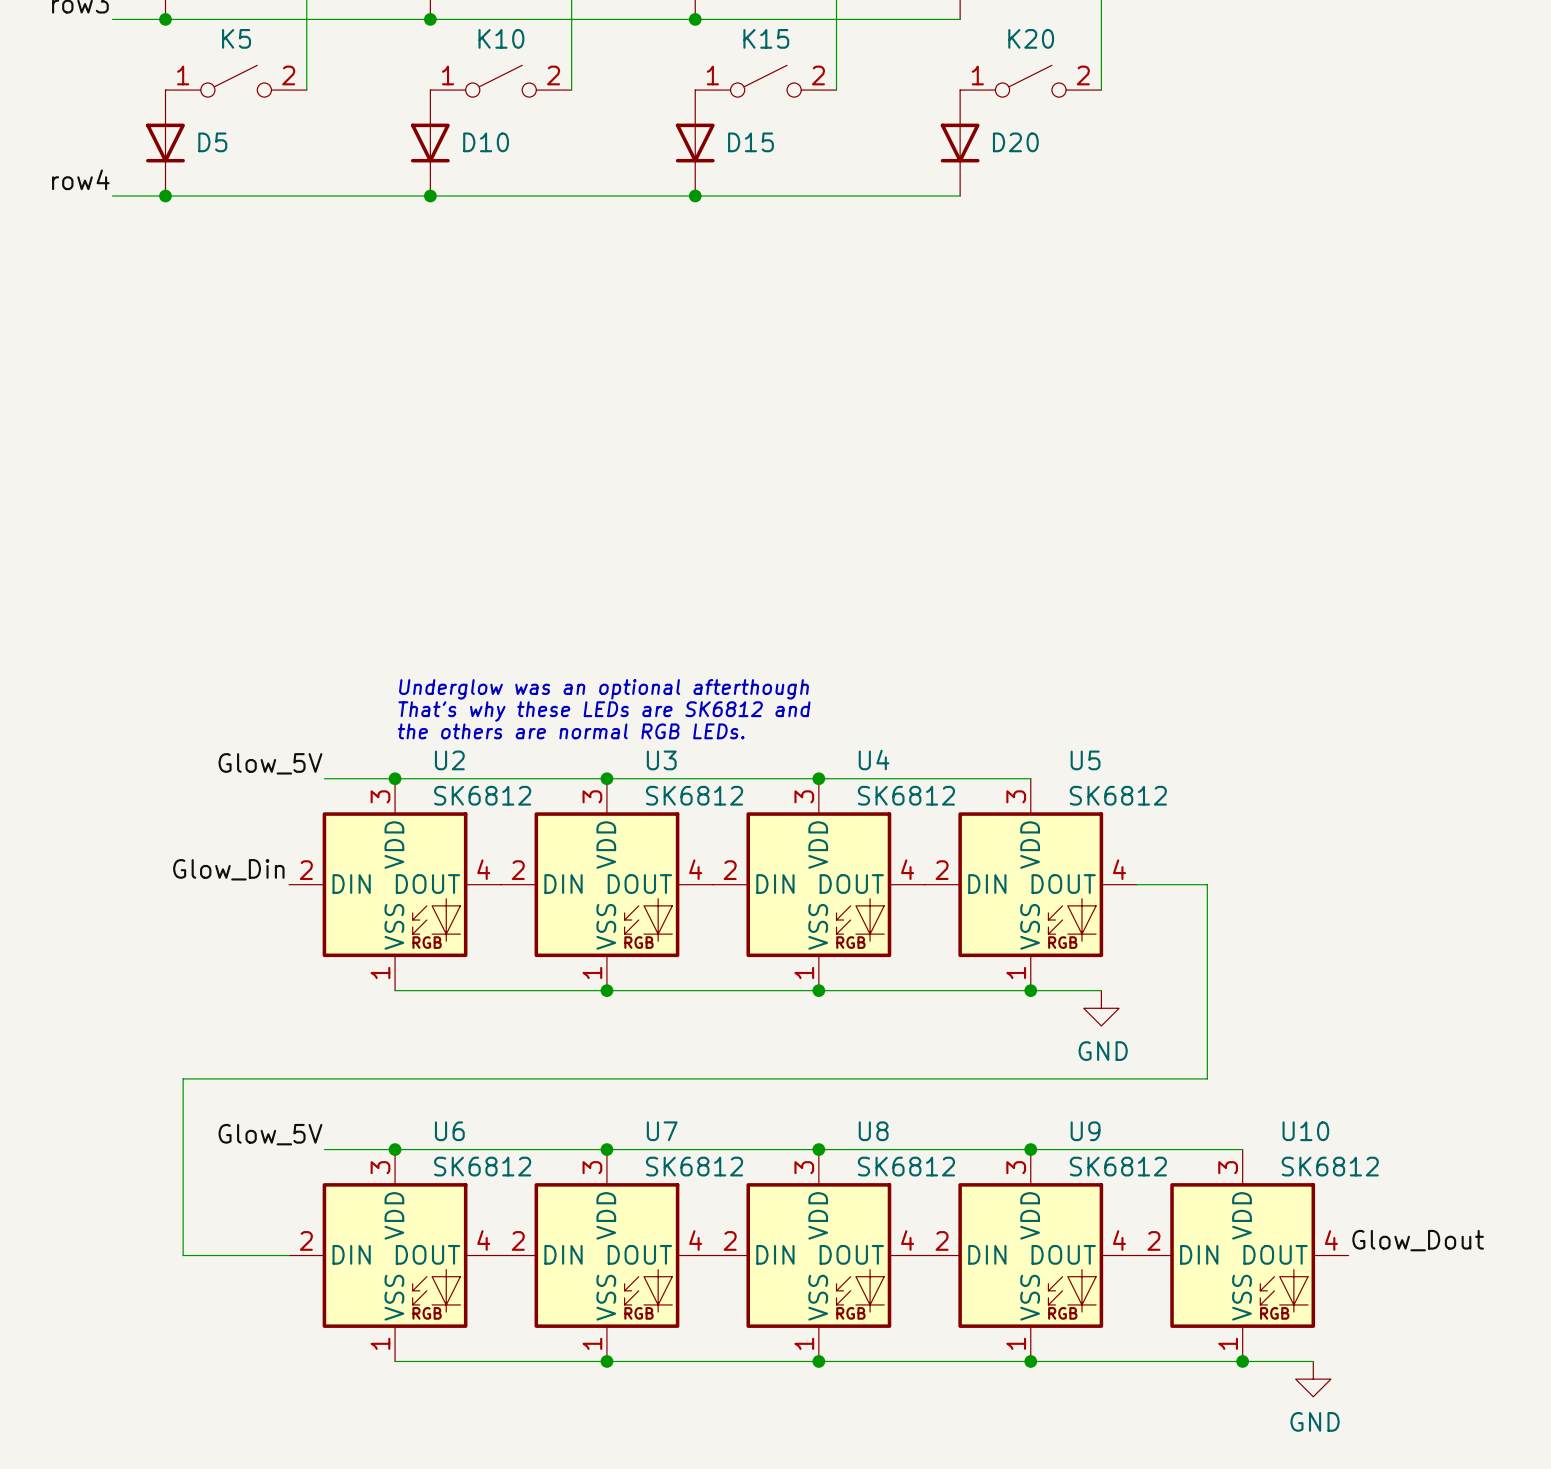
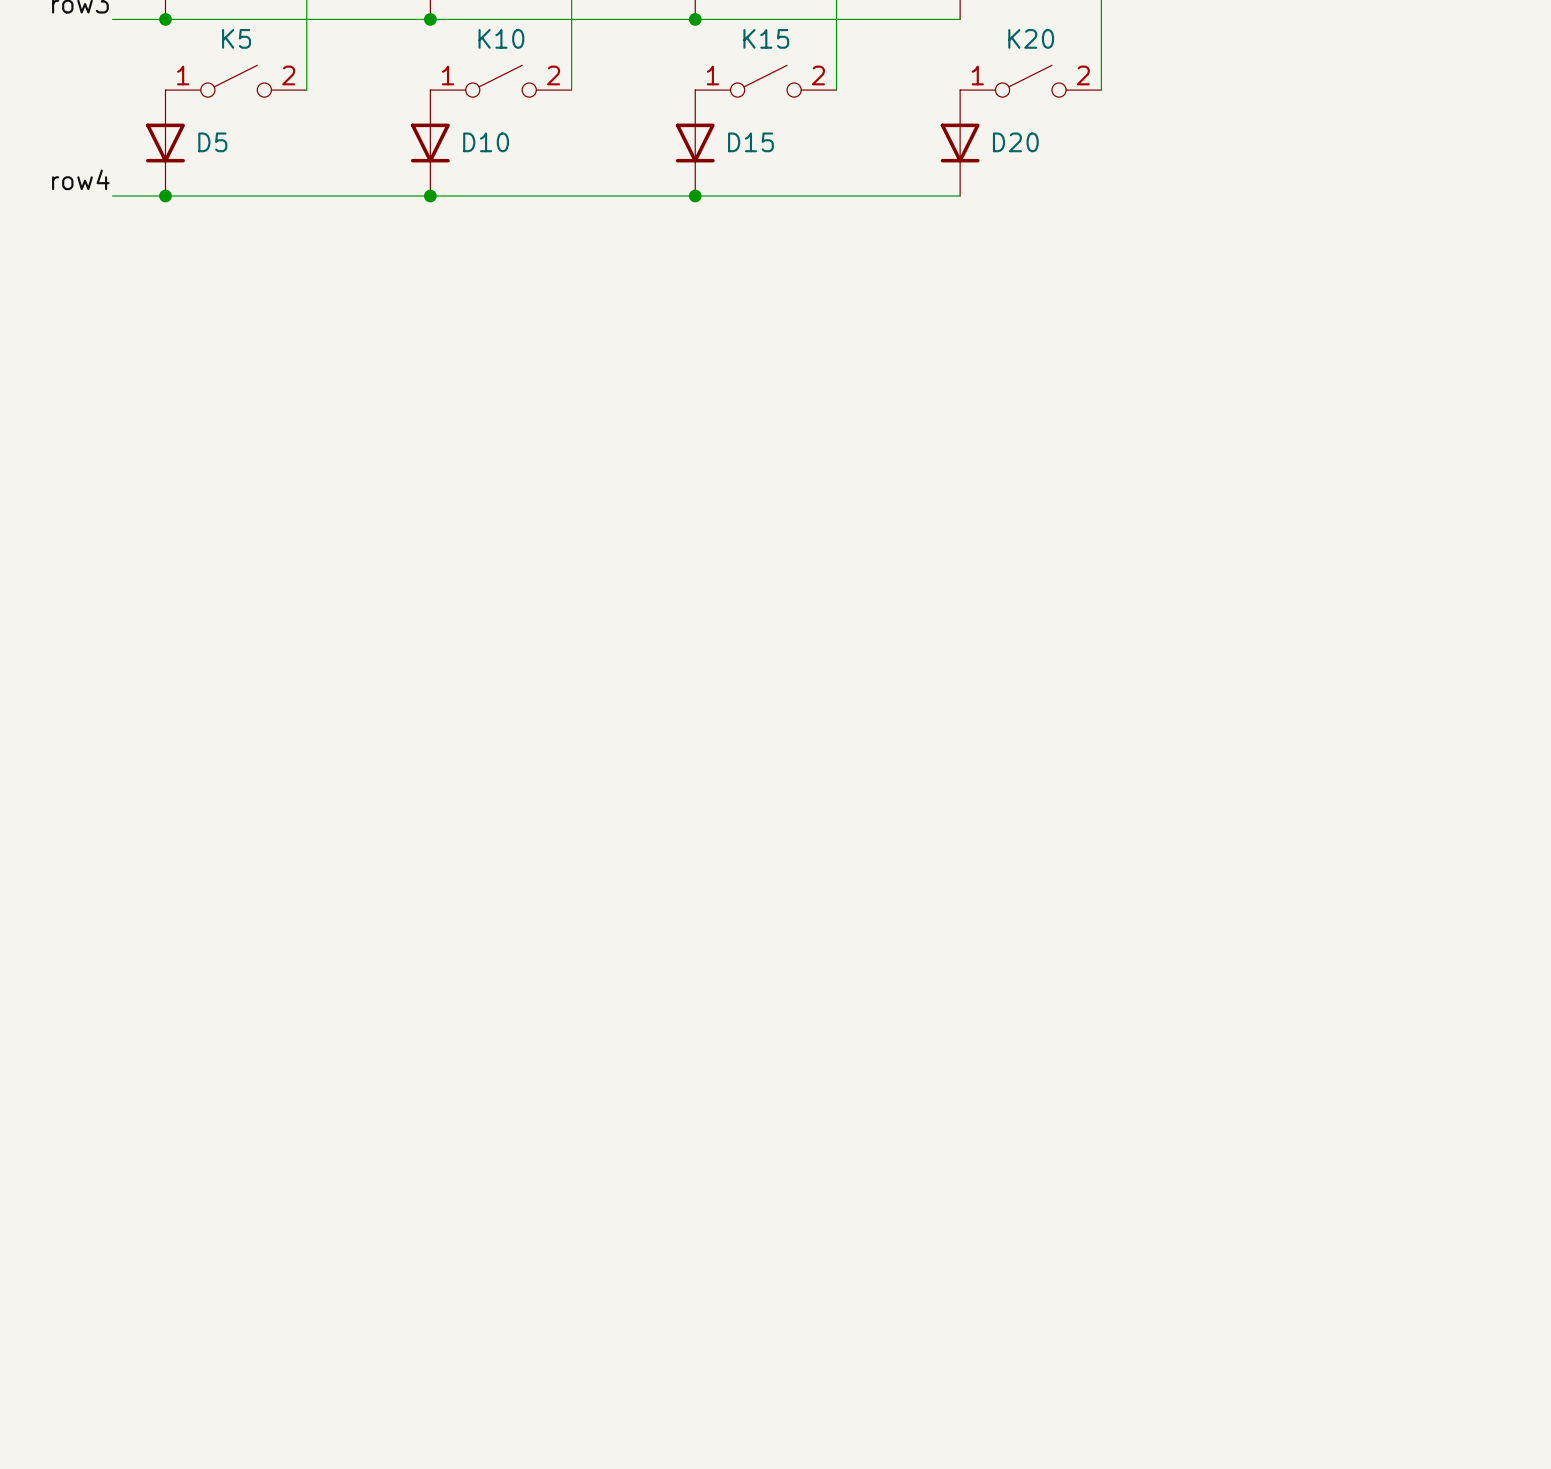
text: Underglow was an optional afterthough (603, 689) -> none
text: That's why these LEDs are SK6812 and (604, 711) -> none
text: the others are normal RGB LEDs. (571, 731) -> none
label: Glow_5V (270, 763) -> none
wire: (324, 778) (1030, 778) -> none
junction: (395, 778) -> none
junction: (606, 778) -> none
junction: (818, 778) -> none
label: Glow_Din (228, 869) -> none
U2: SK6812 (395, 884) -> none
U3: SK6812 (606, 884) -> none
U4: SK6812 (818, 884) -> none
U5: SK6812 (1030, 884) -> none
wire: (1136, 884) (1207, 884) (1207, 1078) (183, 1078) (183, 1255) (289, 1255) -> none
wire: (395, 990) (1101, 990) -> none
junction: (606, 990) -> none
junction: (818, 990) -> none
junction: (1030, 990) -> none
power symbol: GND (1101, 1008) -> none
label: Glow_5V (270, 1134) -> none
wire: (324, 1149) (1242, 1149) -> none
junction: (395, 1149) -> none
junction: (606, 1149) -> none
junction: (818, 1149) -> none
junction: (1030, 1149) -> none
label: Glow_Dout (1418, 1240) -> none
U6: SK6812 (395, 1255) -> none
U7: SK6812 (606, 1255) -> none
U8: SK6812 (818, 1255) -> none
U9: SK6812 (1030, 1255) -> none
U10: SK6812 (1242, 1255) -> none
wire: (395, 1361) (1313, 1361) -> none
junction: (606, 1361) -> none
junction: (818, 1361) -> none
junction: (1030, 1361) -> none
junction: (1242, 1361) -> none
power symbol: GND (1313, 1379) -> none

